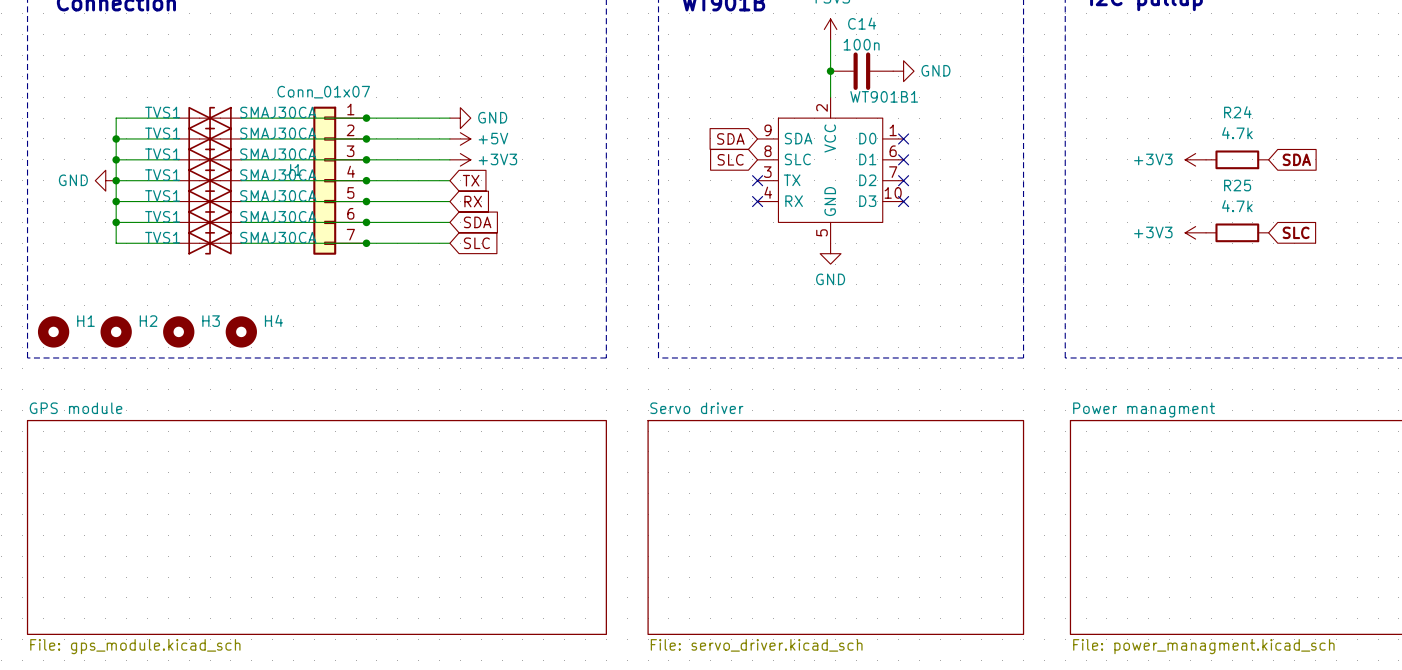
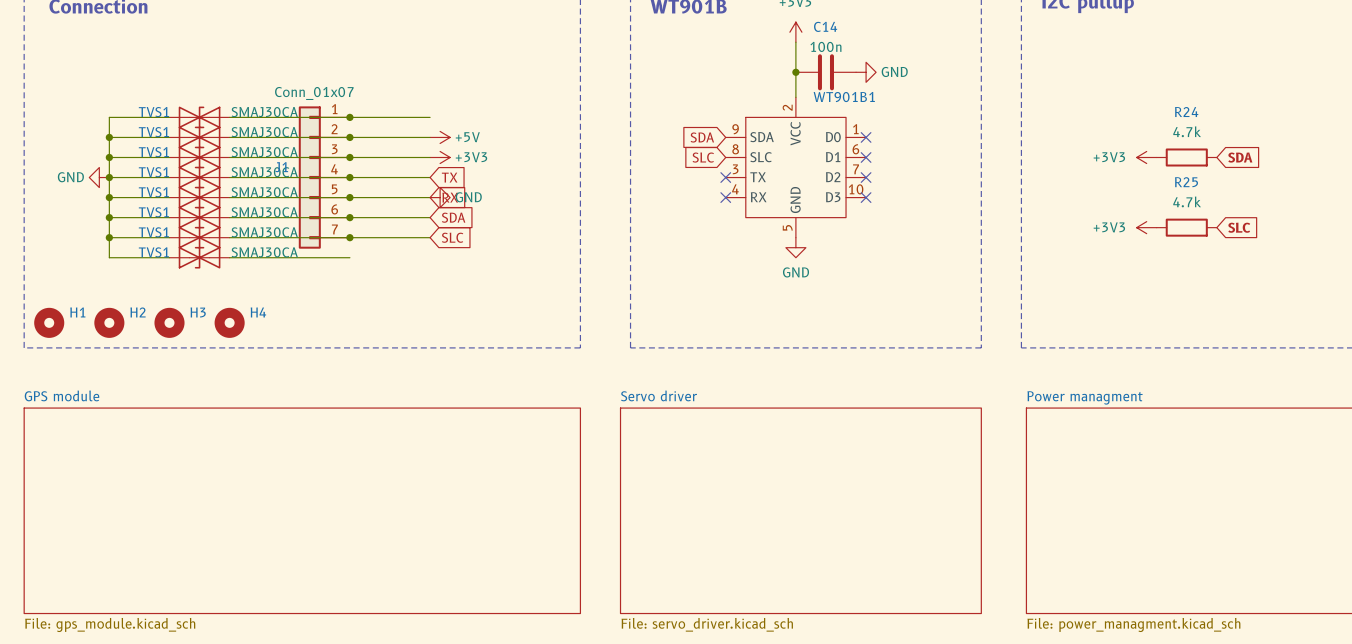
power symbol position: GND (460, 118) -> GND (440, 197)
wire: none -> (109, 237) (109, 257) (169, 257)
junction: none -> (109, 237)
TVS1: none -> SMAJ30CA (199, 257)
wire: none -> (229, 257) (349, 257)

